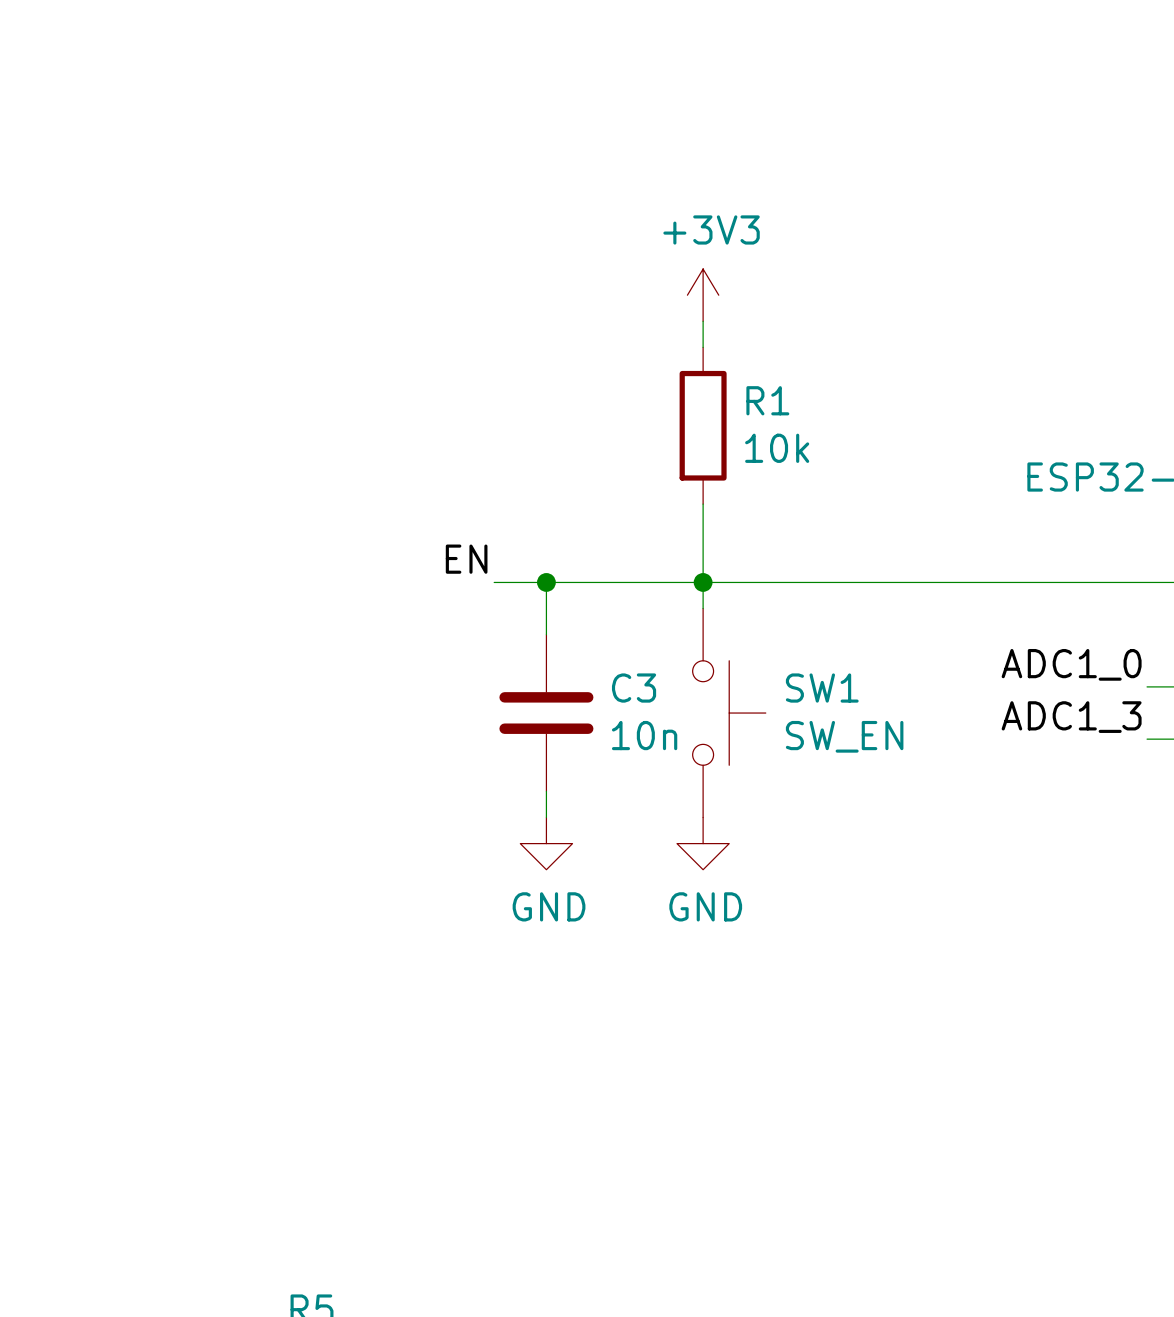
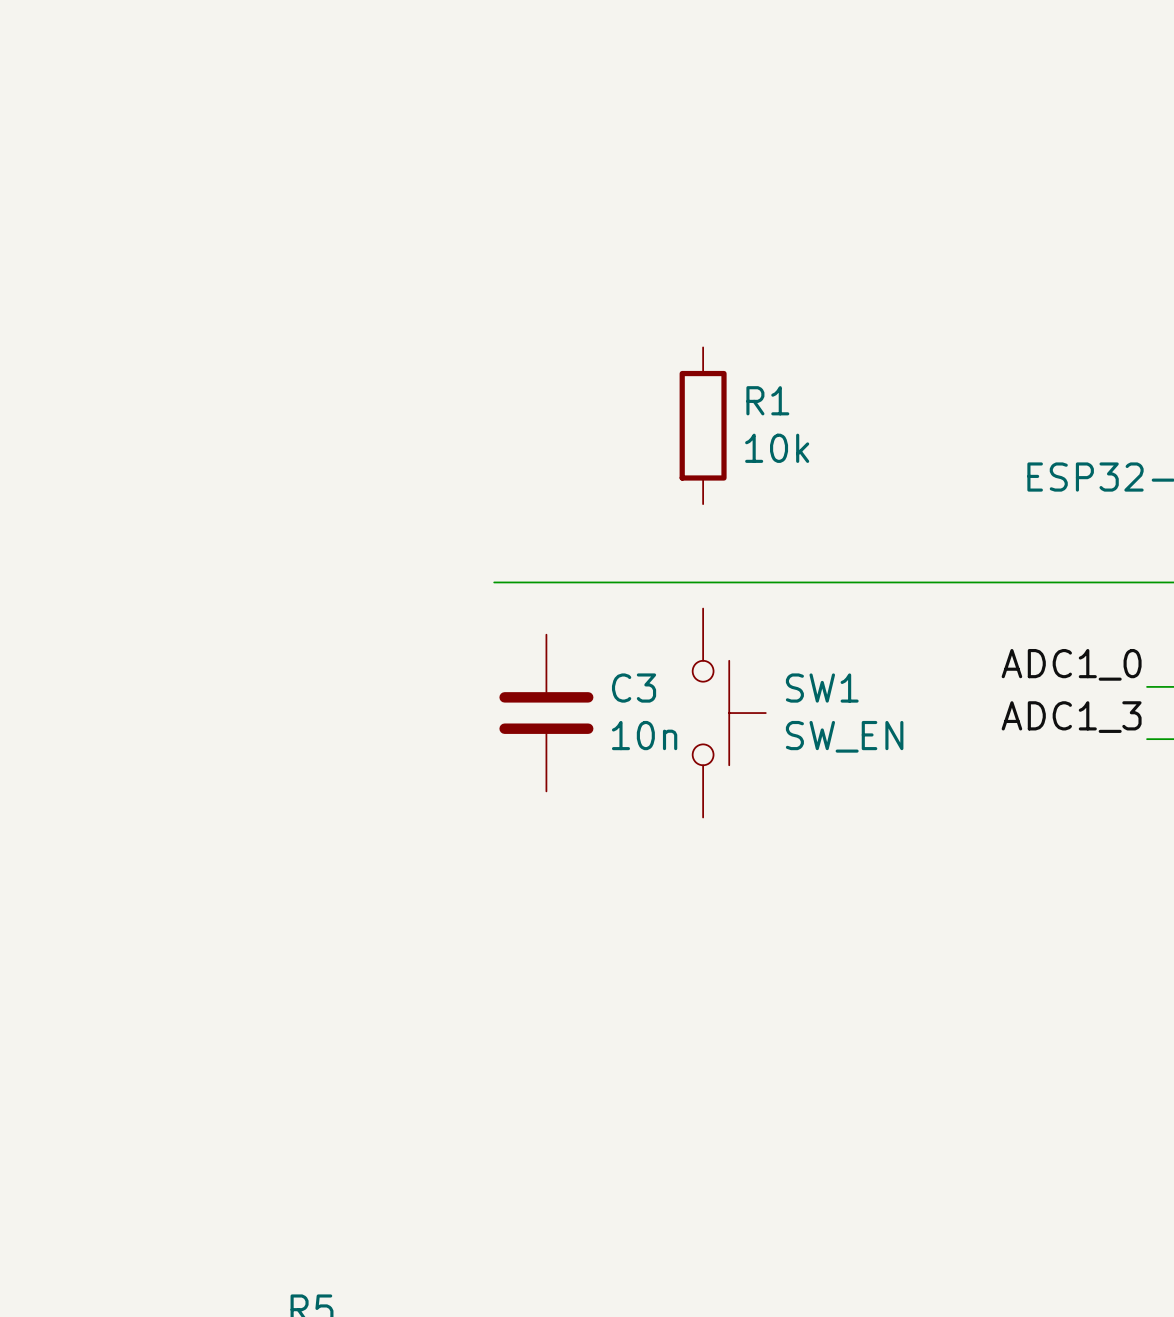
power symbol: +3V3 (703, 295) -> none
wire: (703, 321) (703, 347) -> none
wire: (703, 504) (703, 608) -> none
label: EN (466, 559) -> none
wire: (546, 582) (546, 634) -> none
junction: (546, 582) -> none
junction: (703, 582) -> none
wire: (546, 791) (546, 817) -> none
power symbol: GND (546, 843) -> none
power symbol: GND (703, 843) -> none

